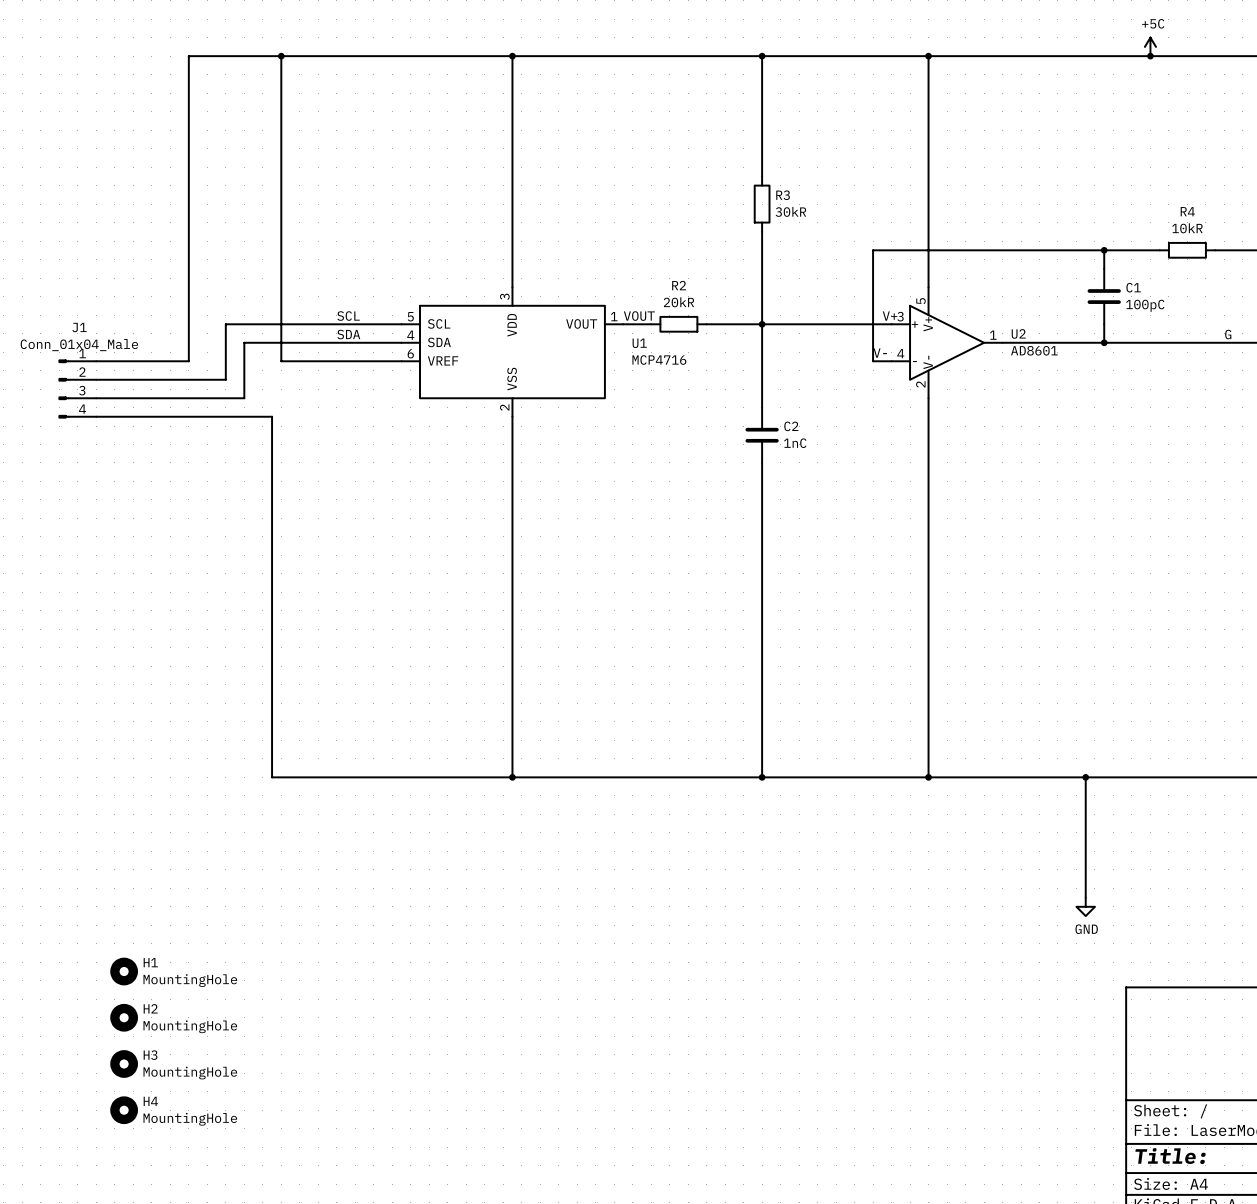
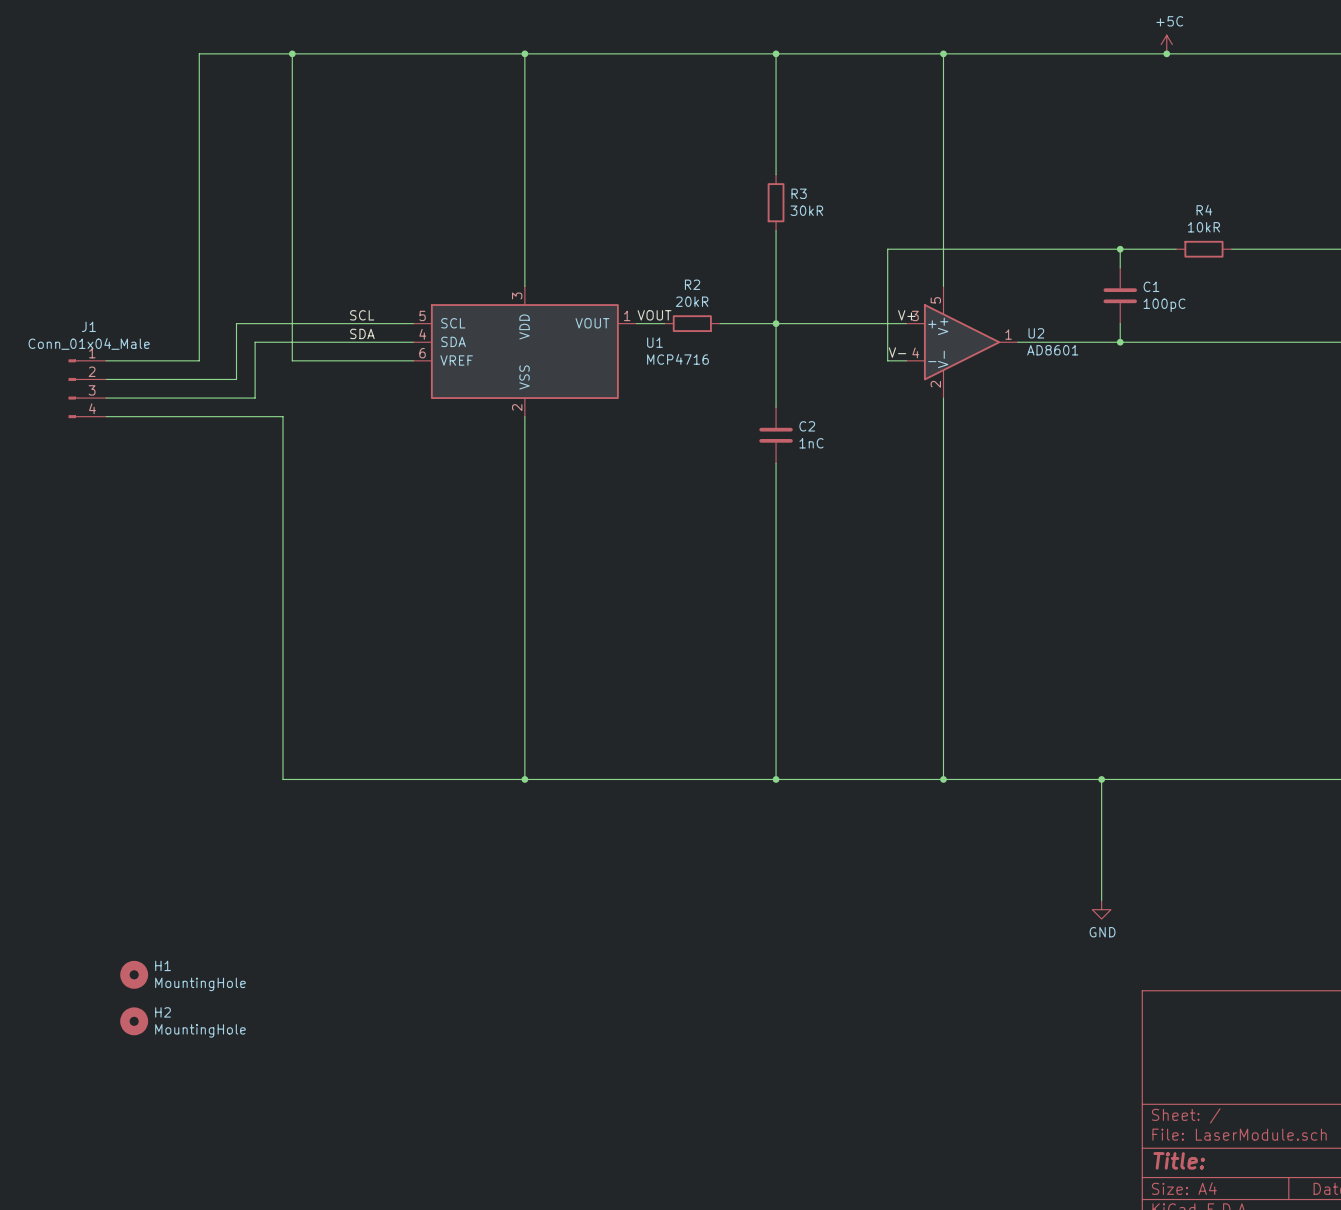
label: G (1228, 334) -> none
H3: MountingHole (124, 1063) -> none
H4: MountingHole (124, 1110) -> none

